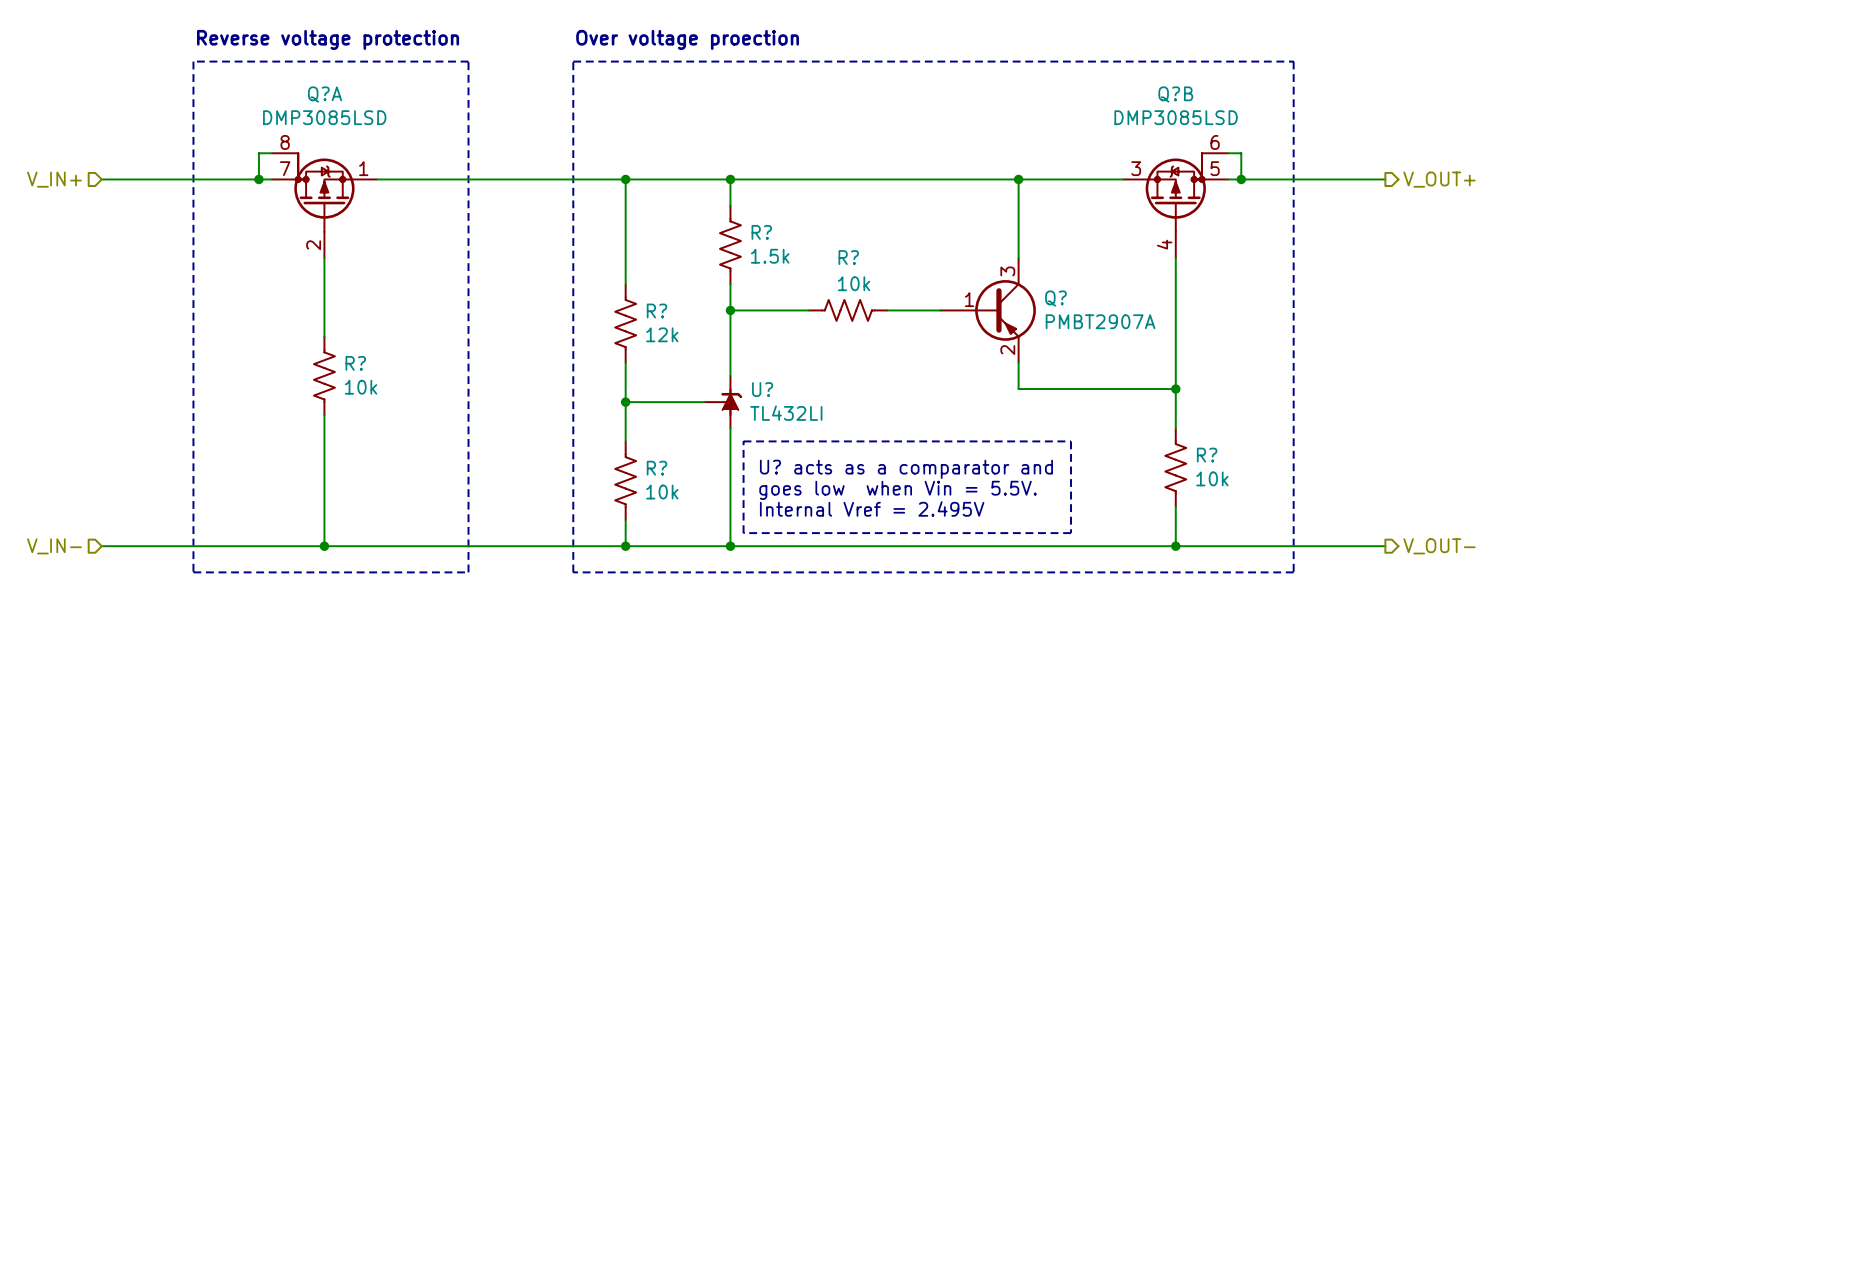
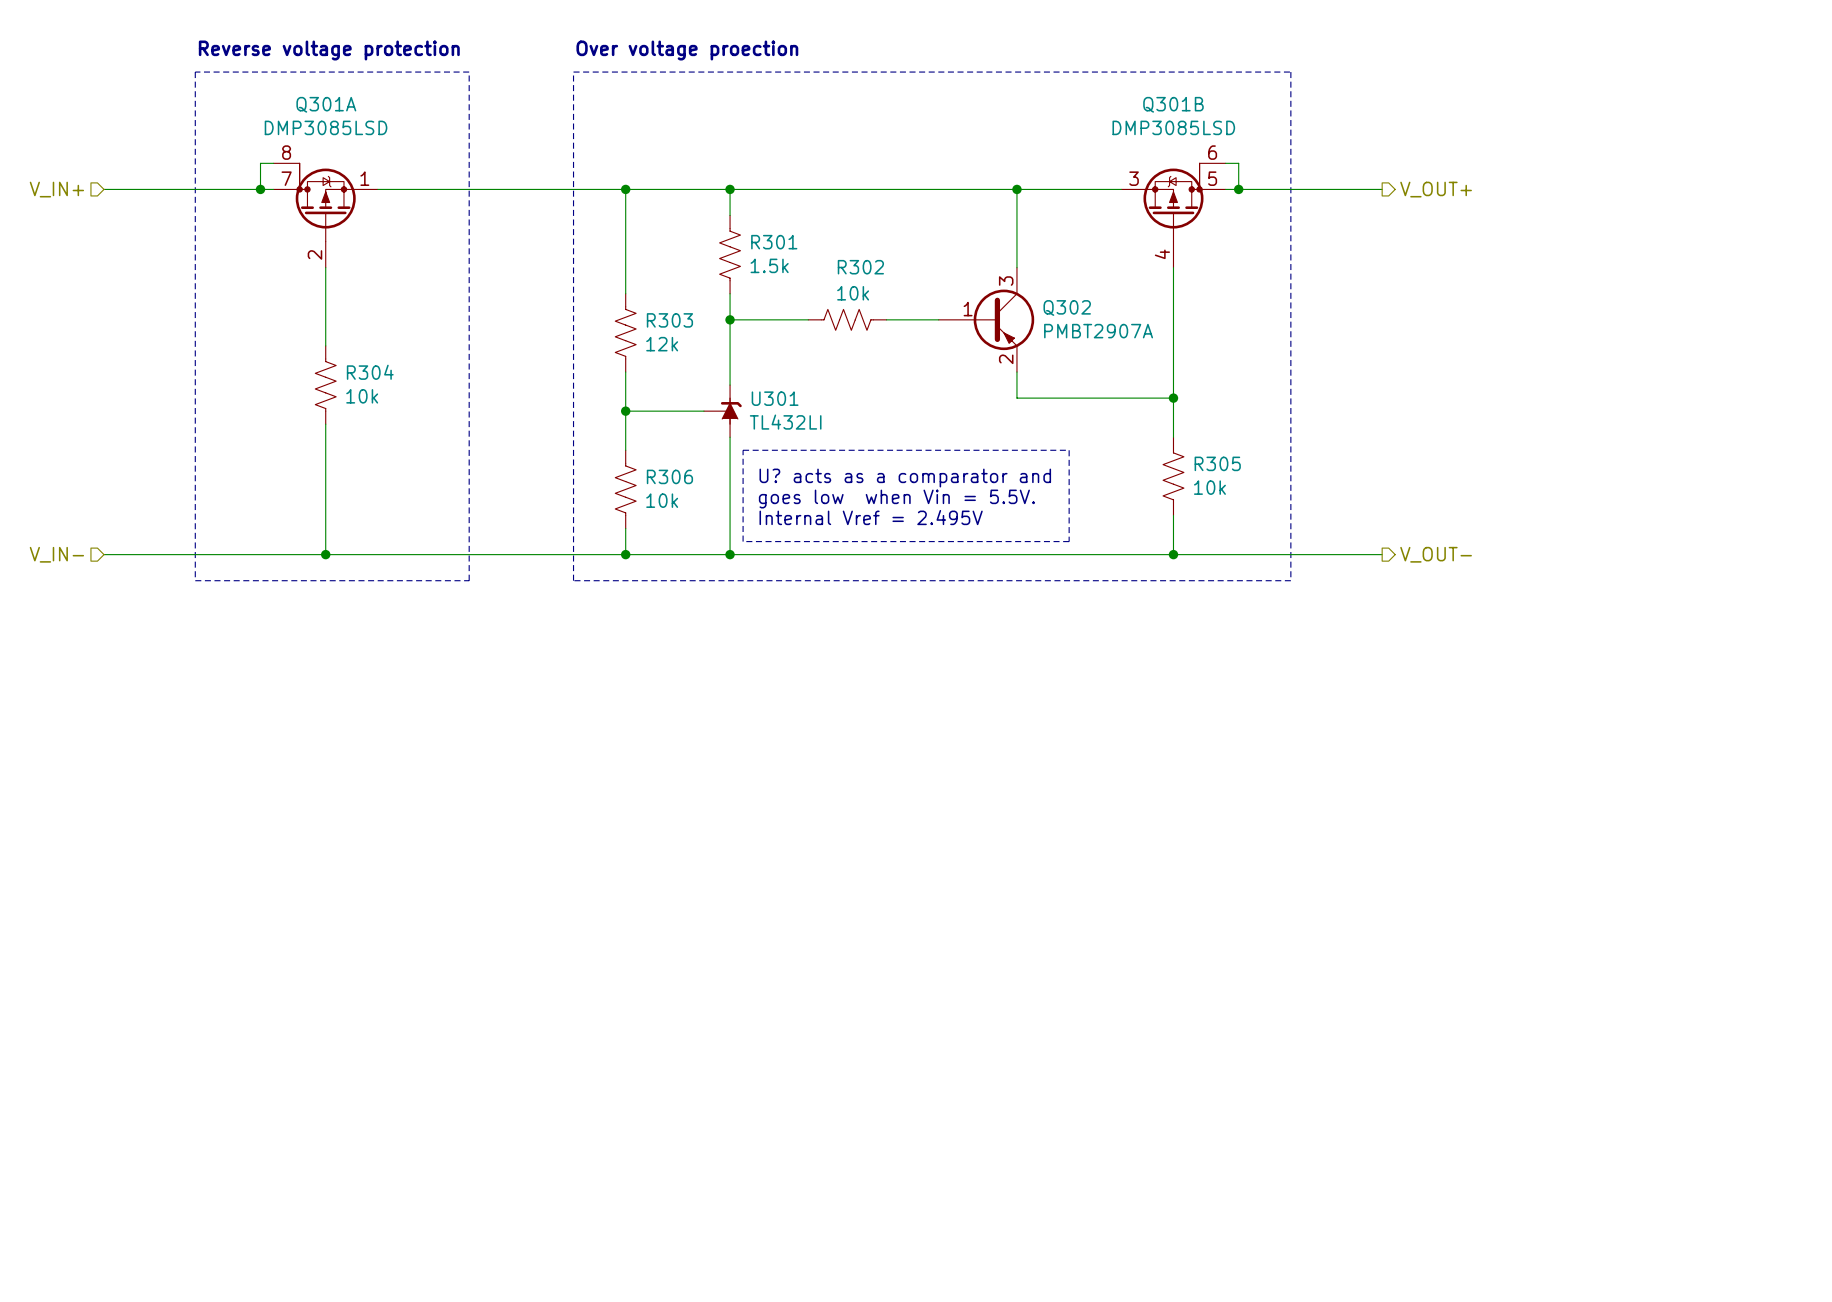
Q?A name: Q?A (325, 94) -> Q301A (326, 104)
Q?B name: Q?B (1175, 94) -> Q301B (1173, 104)
R? name: R? (761, 232) -> R301 (774, 242)
R? name: R? (848, 257) -> R302 (860, 267)
Q? name: Q? (1055, 298) -> Q302 (1067, 307)
R? name: R? (657, 311) -> R303 (669, 320)
R? name: R? (355, 363) -> R304 (370, 372)
U? name: U? (762, 389) -> U301 (775, 398)
R? name: R? (1207, 455) -> R305 (1217, 463)
R? name: R? (657, 468) -> R306 (669, 476)

